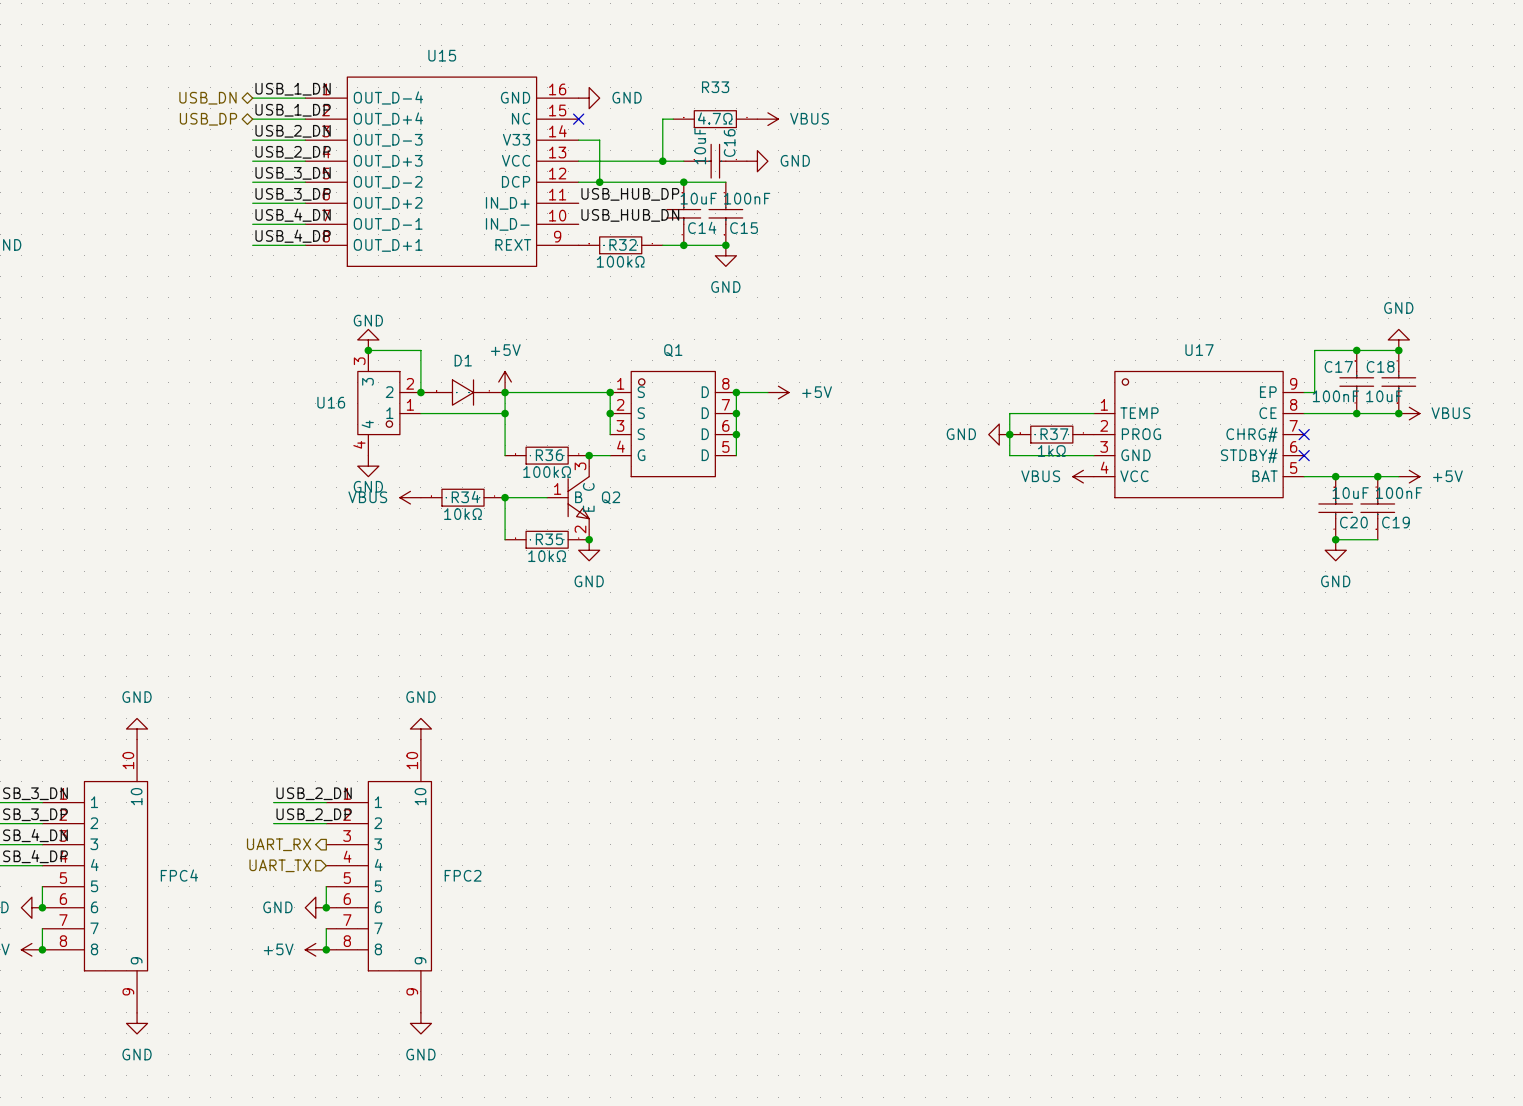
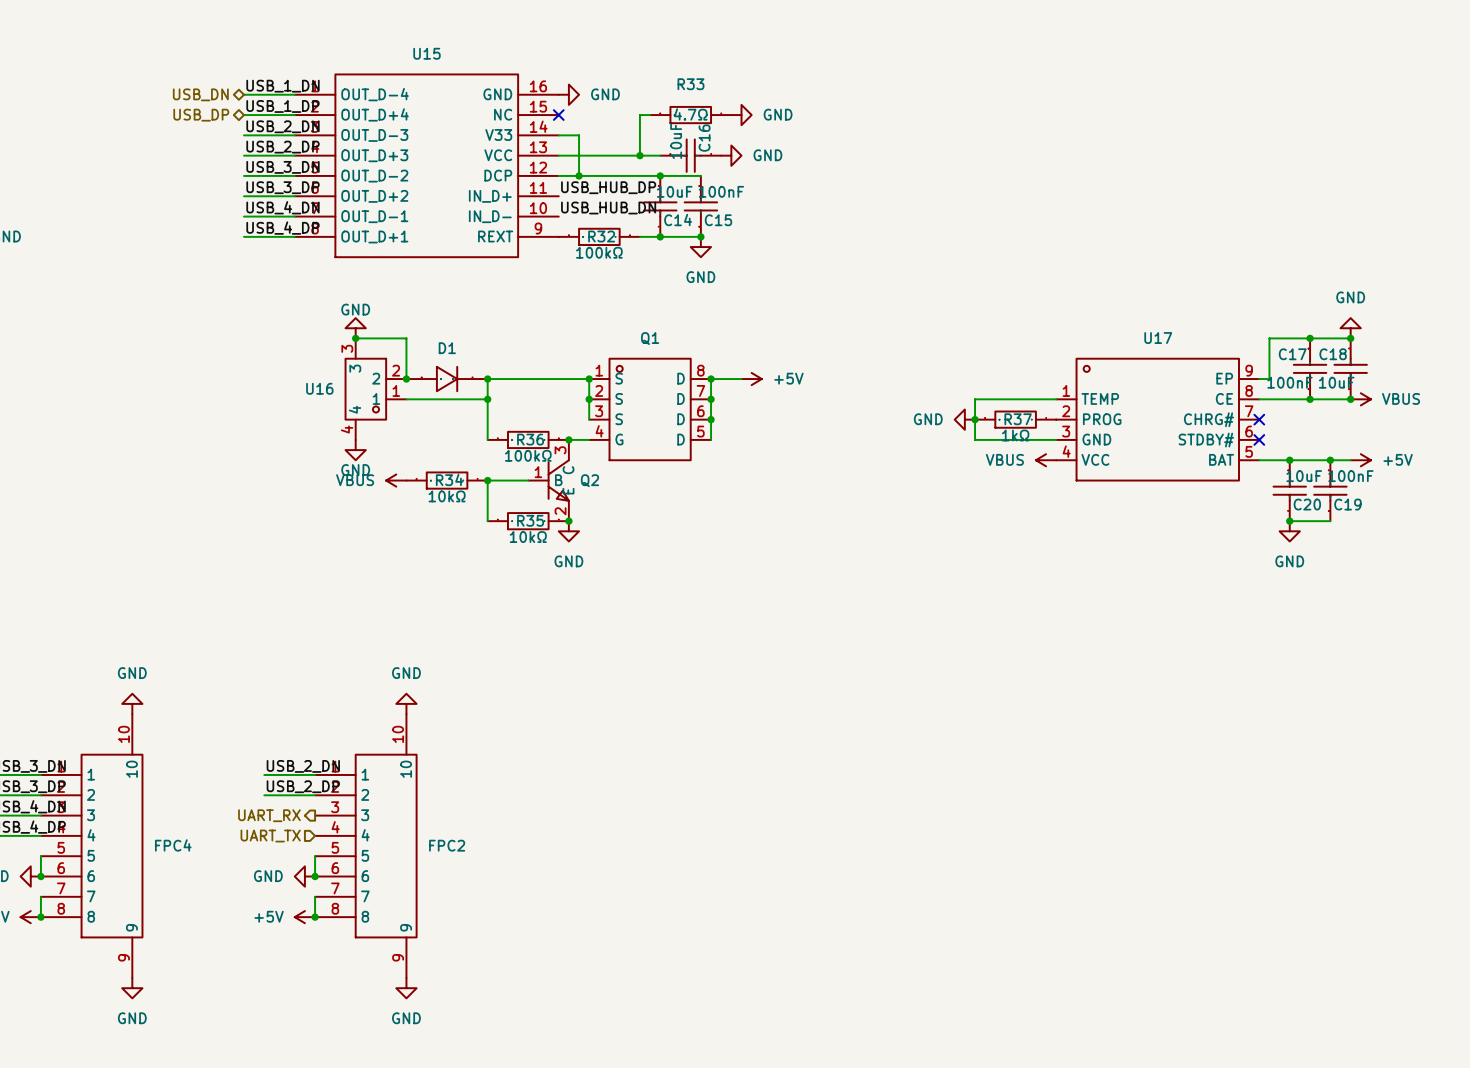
power symbol: VBUS (767, 119) -> GND (741, 115)
power symbol: +5V (505, 382) -> none

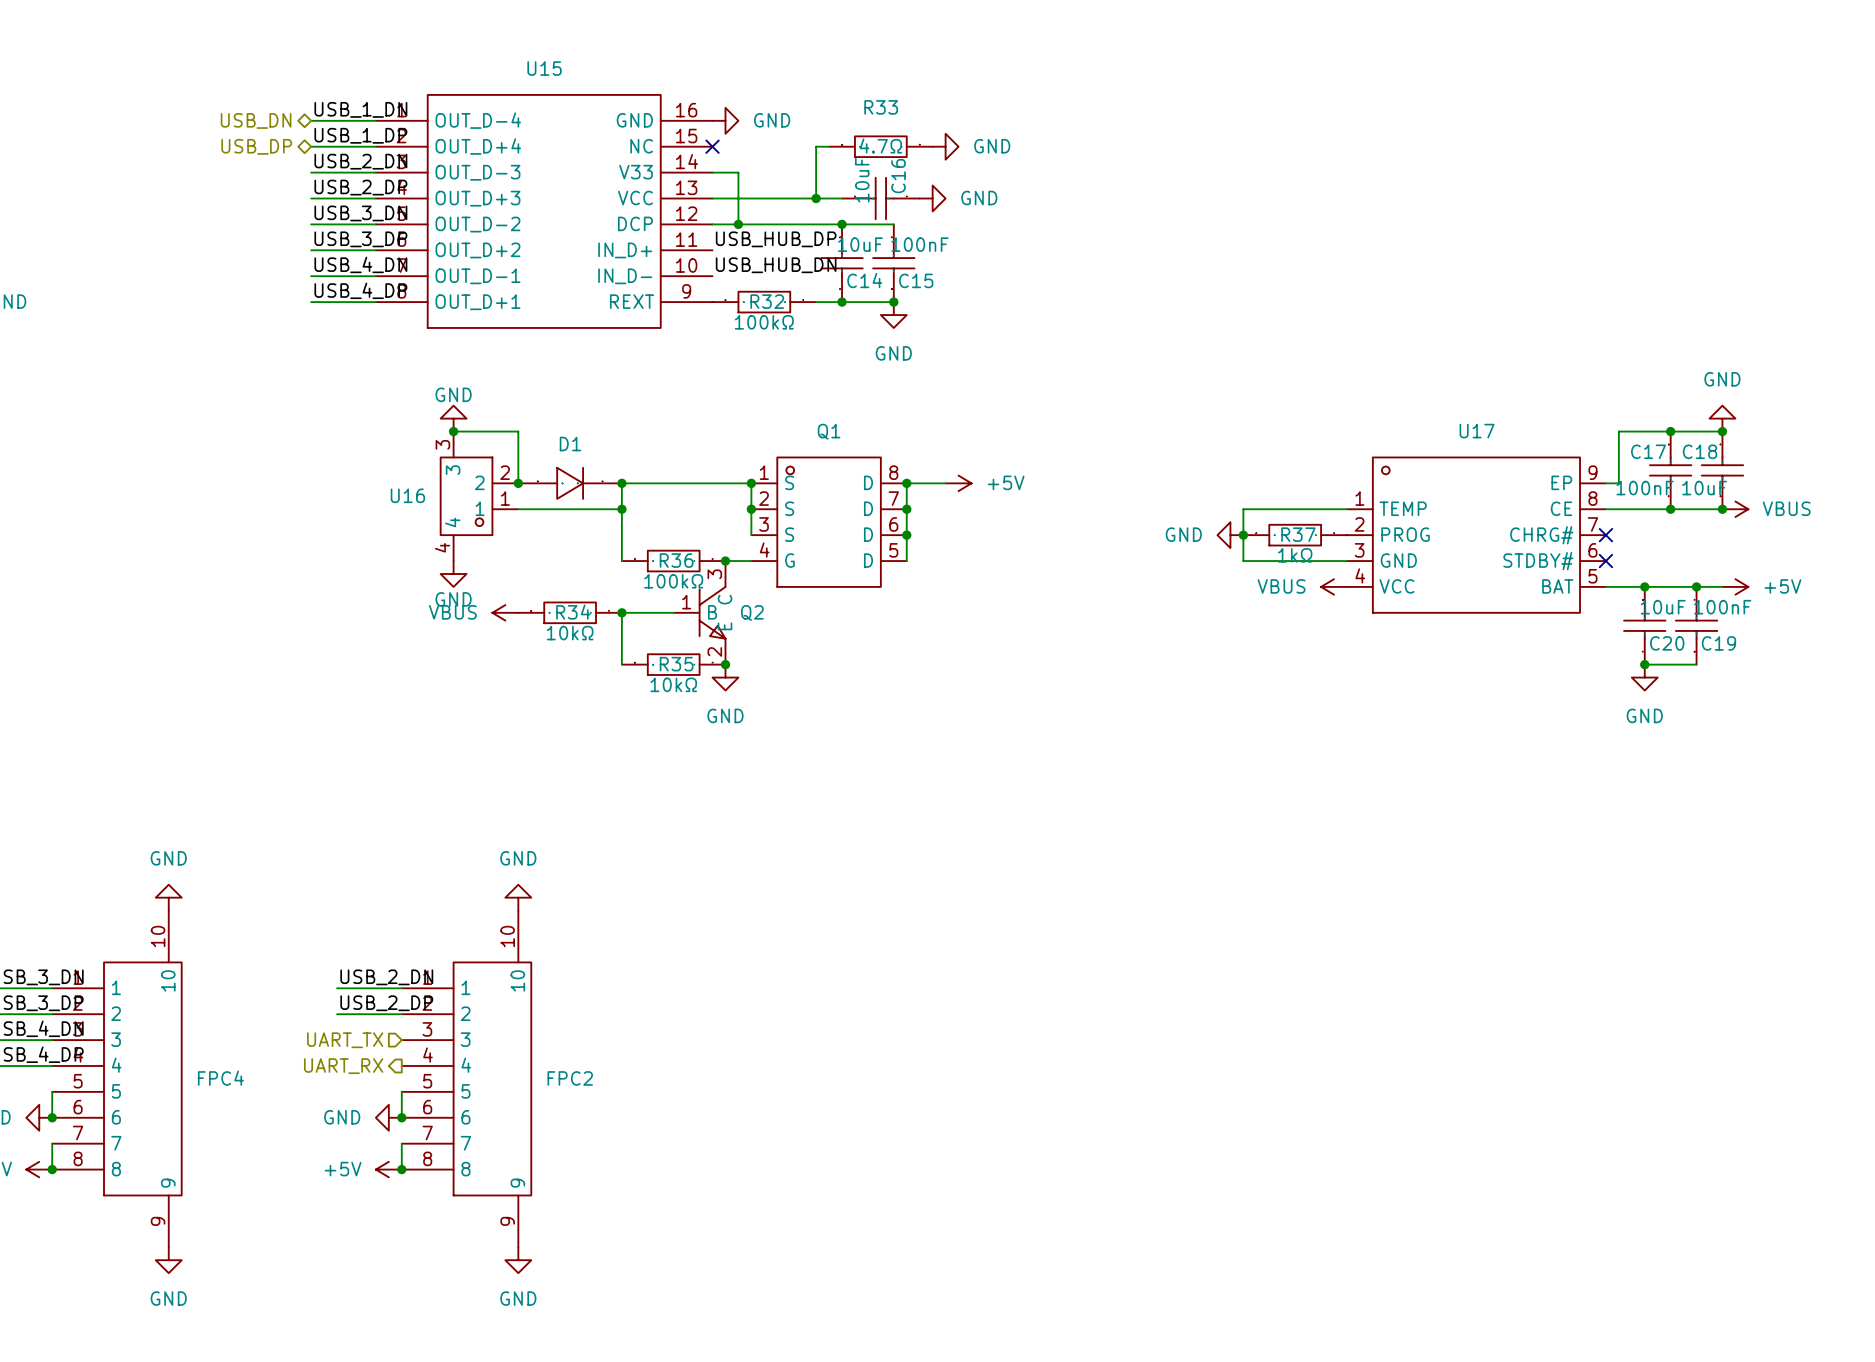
hierarchical label shape: output (269, 815) -> input (345, 1040)
hierarchical label: UART_RX (269, 815) -> UART_TX (345, 1040)
hierarchical label shape: input (270, 836) -> output (343, 1066)
hierarchical label: UART_TX (270, 836) -> UART_RX (343, 1066)

